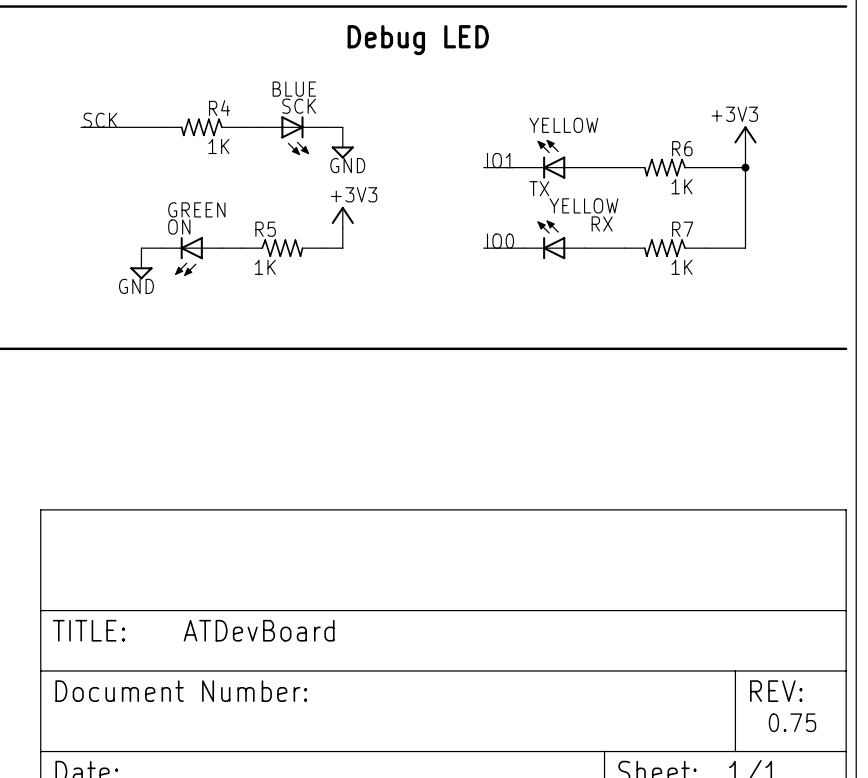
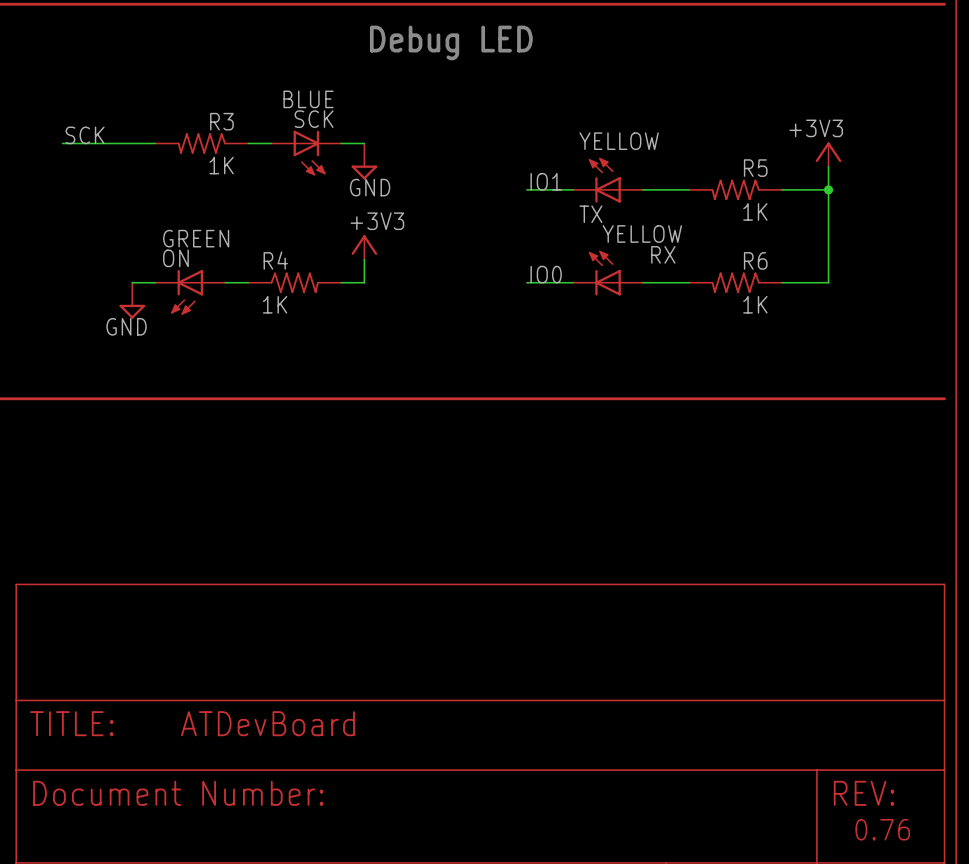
R4 name: R4 (219, 108) -> R3 (221, 121)
R6 name: R6 (682, 148) -> R5 (755, 168)
R5 name: R5 (265, 229) -> R4 (275, 260)
R7 name: R7 (682, 229) -> R6 (755, 260)
text: 0.75 (792, 722) -> 0.76 (882, 829)

